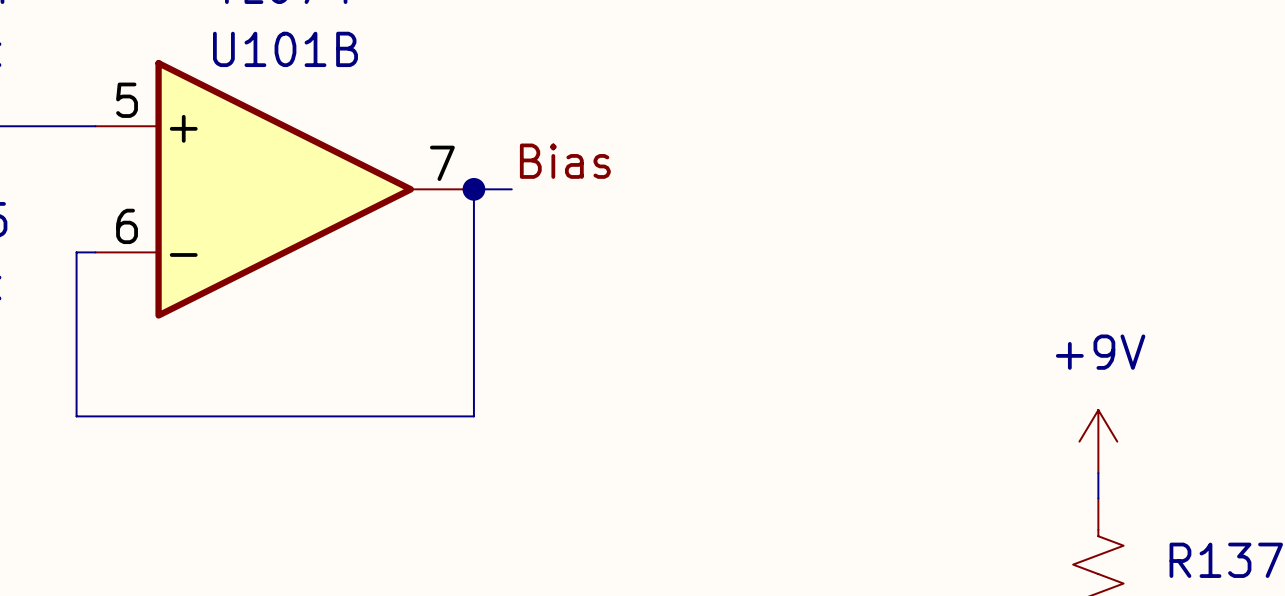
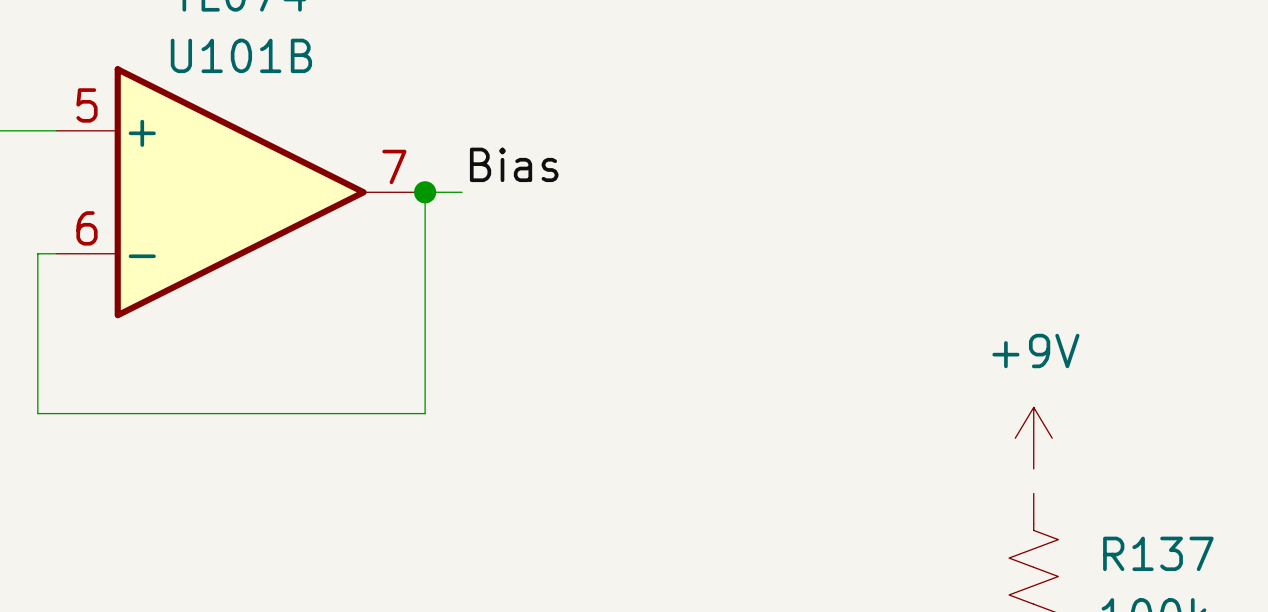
wire: (1098, 473) (1098, 498) -> none

